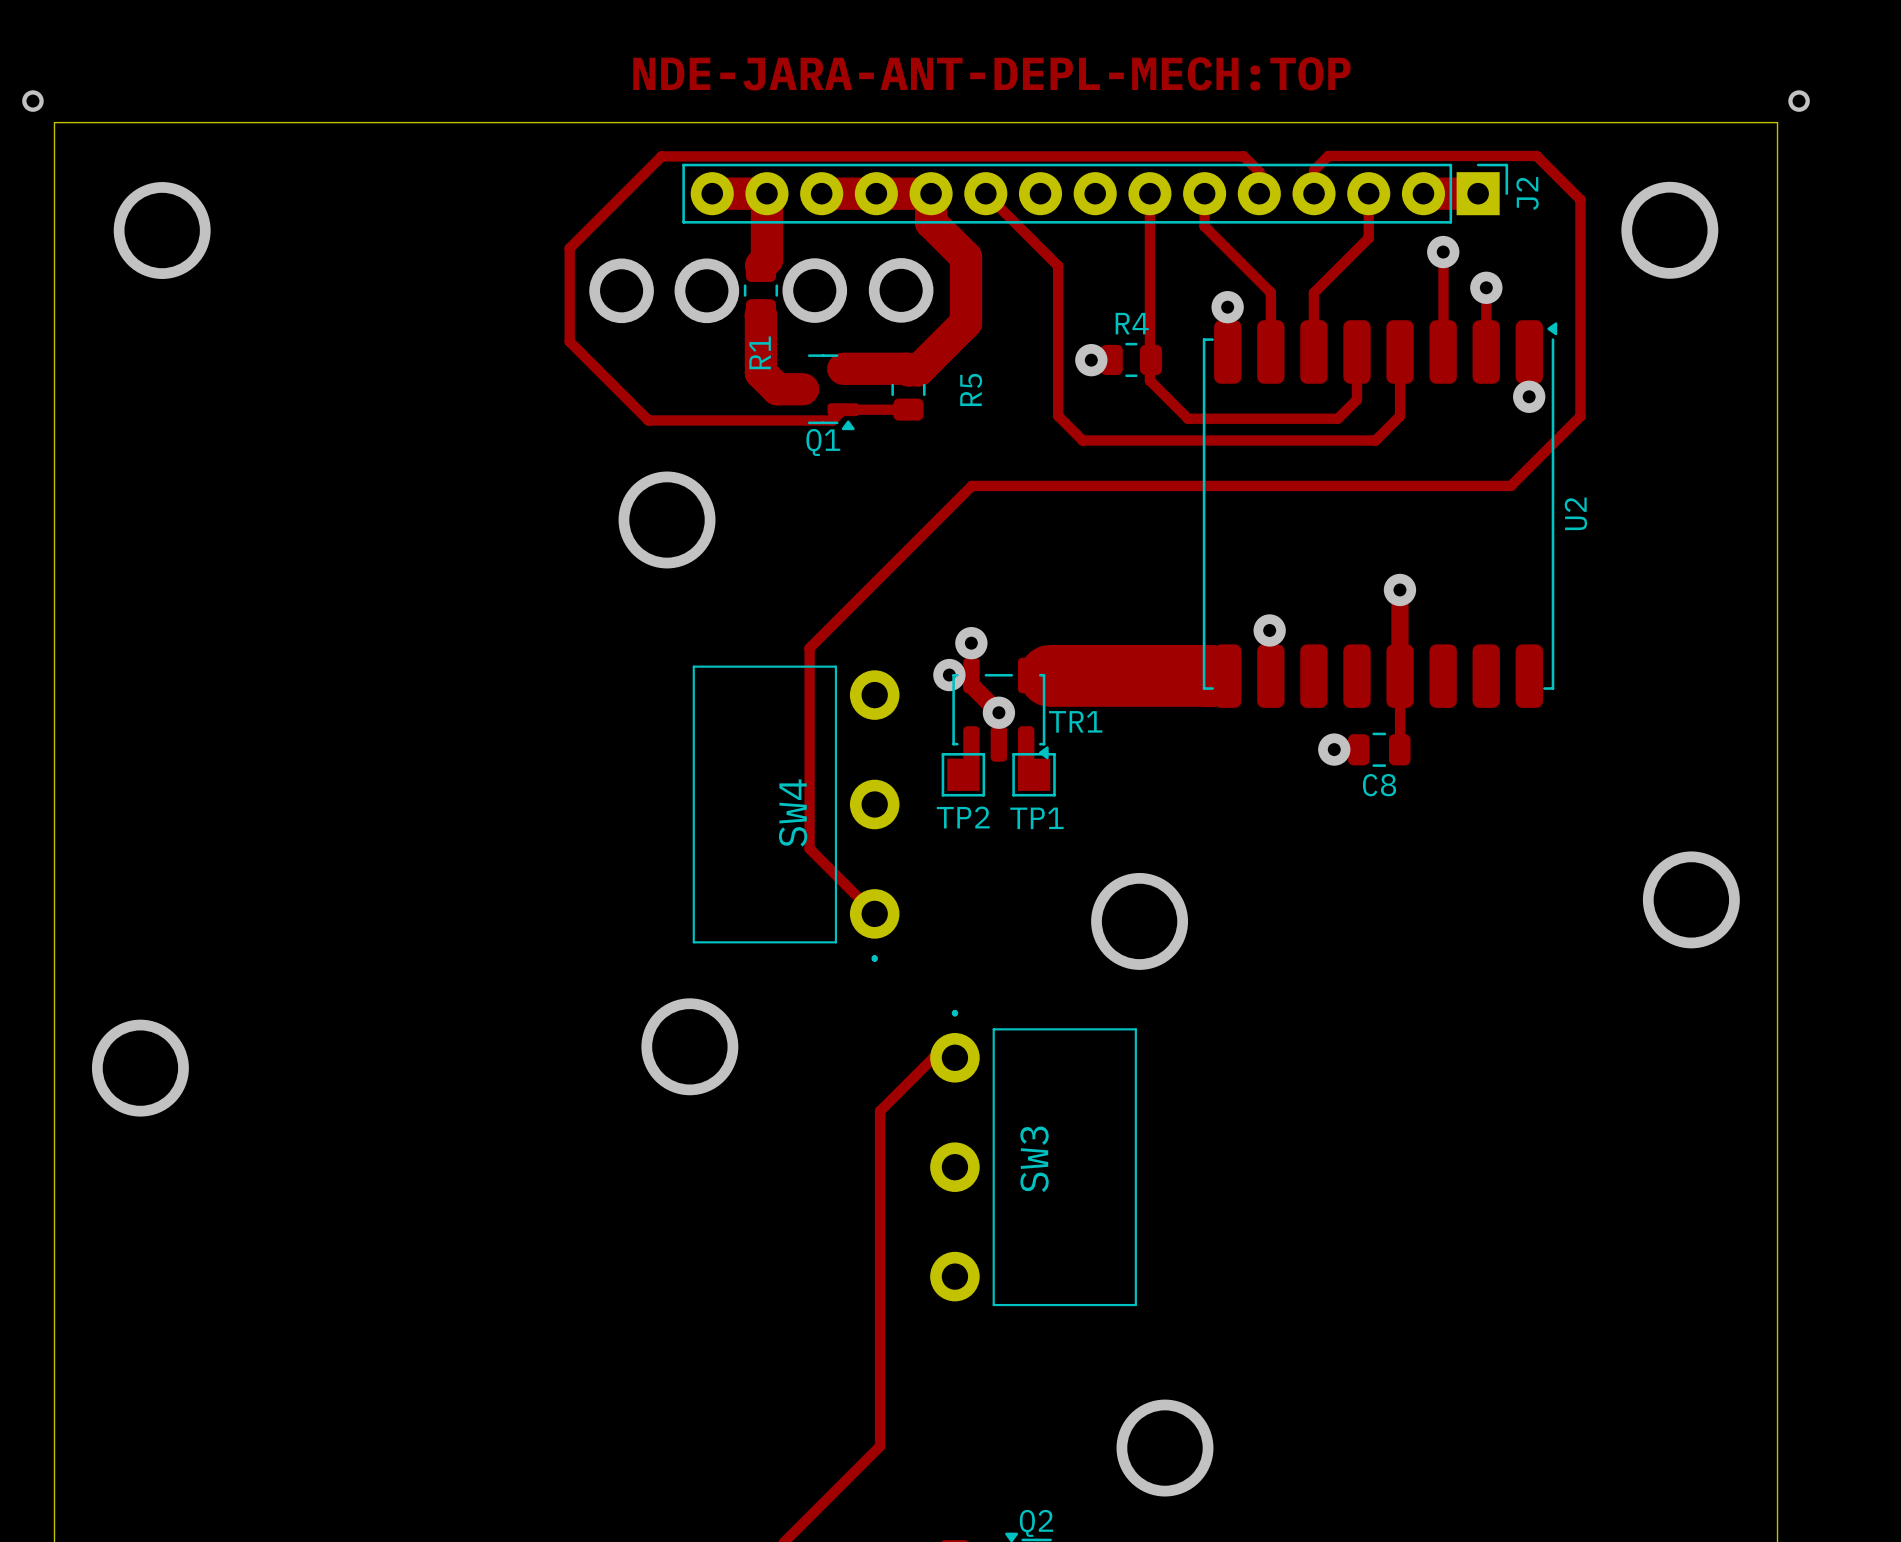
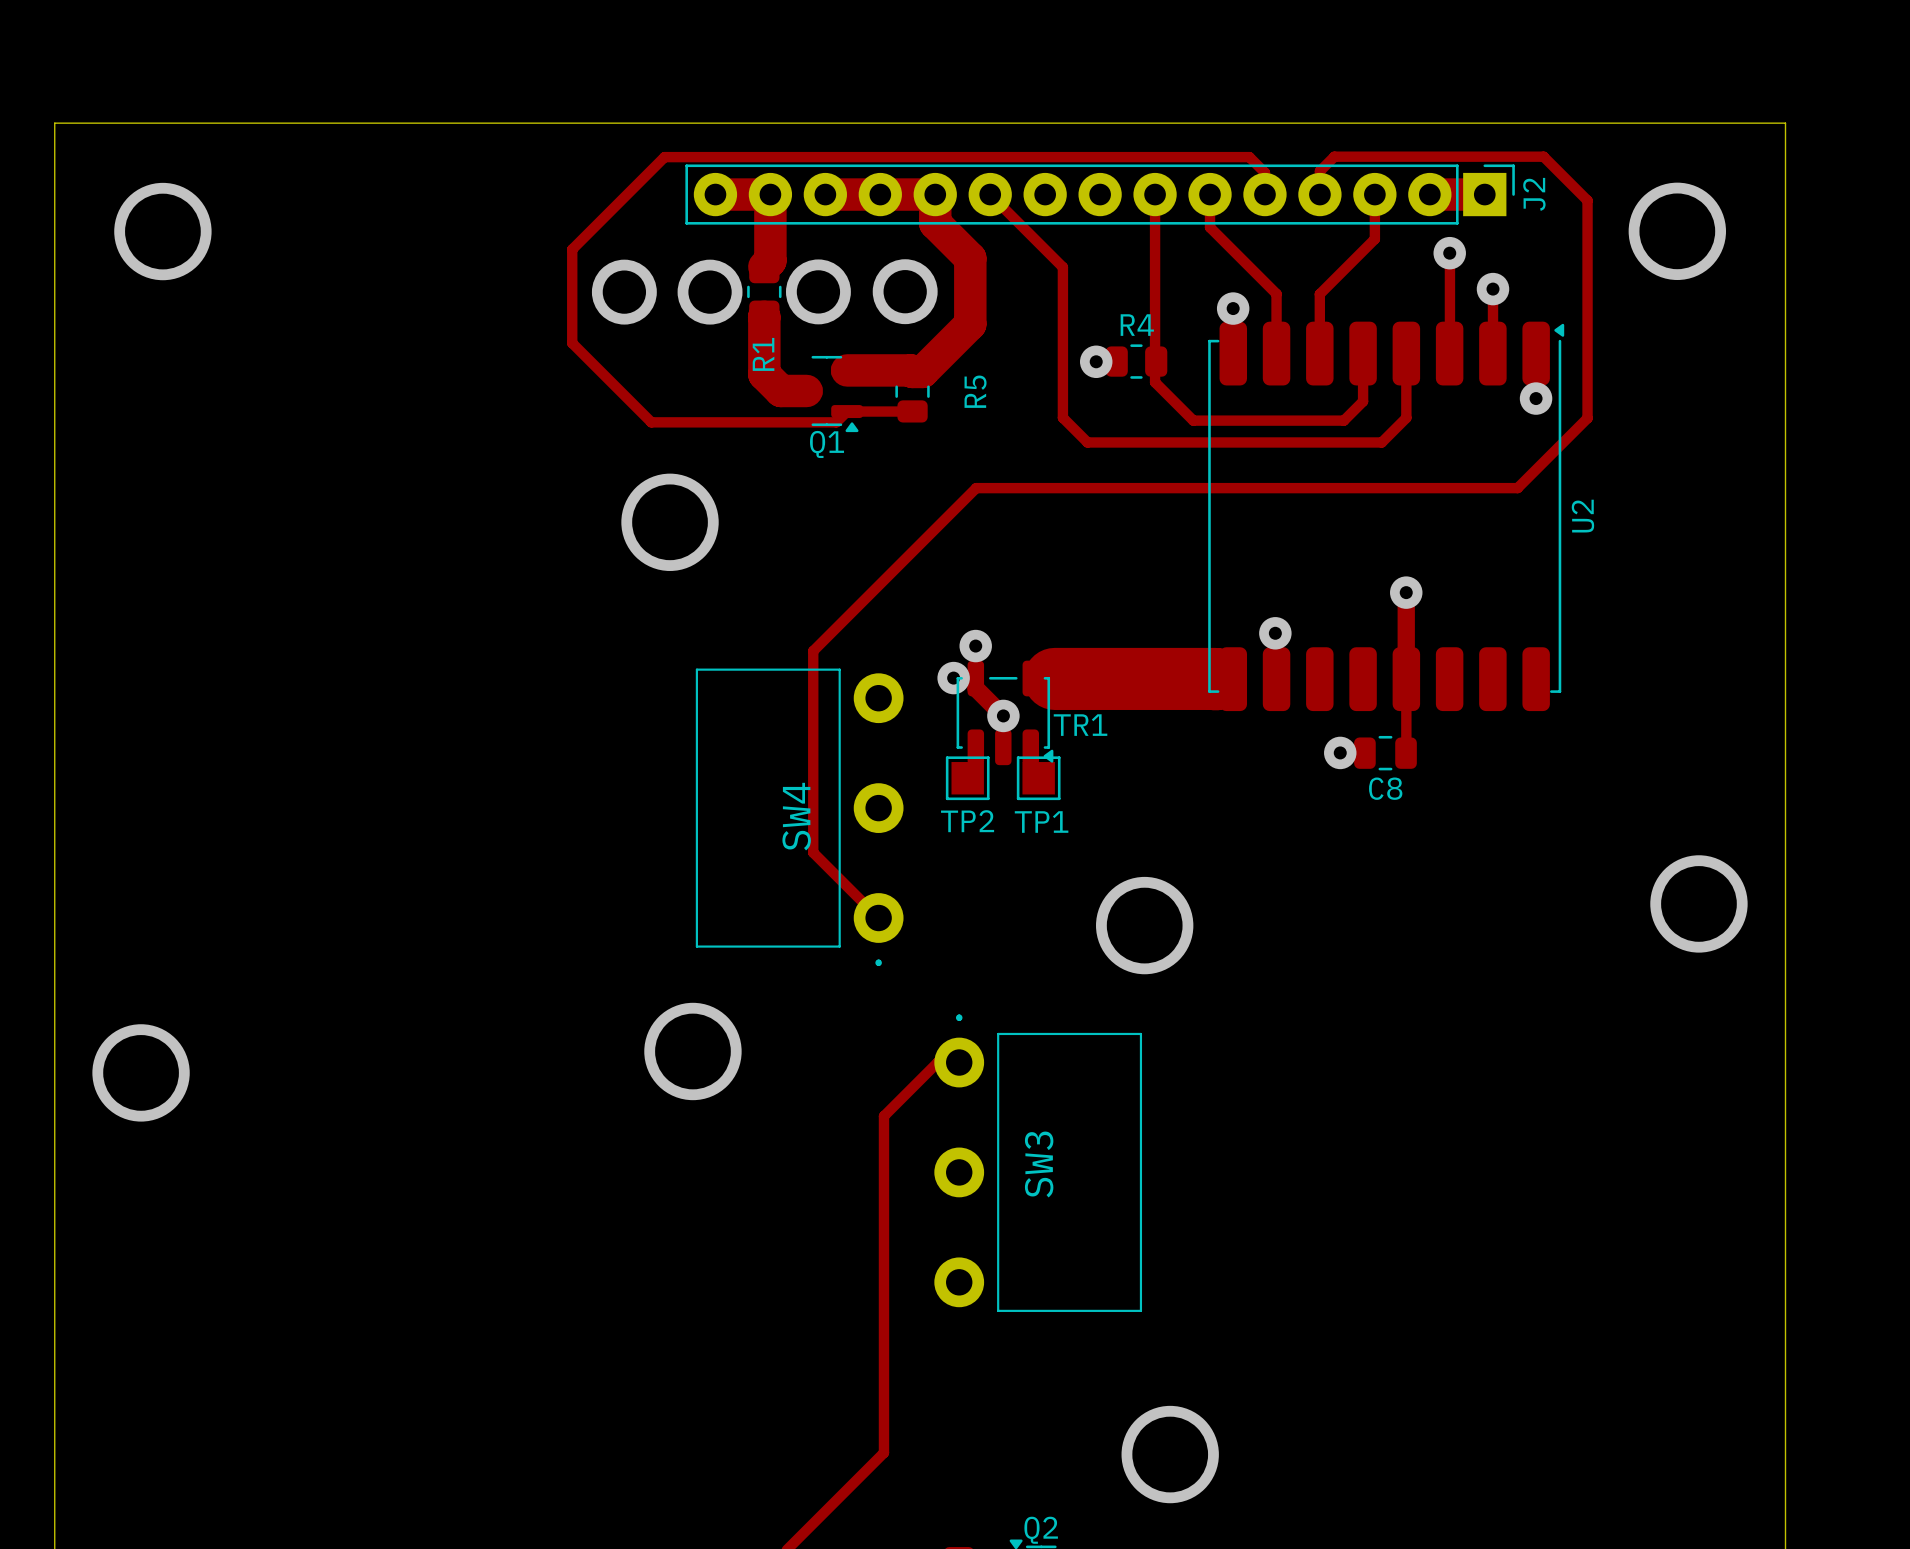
text: NDE-JARA-ANT-DEPL-MECH:TOP (991, 73) -> none
via: (32, 101) -> none
via: (1799, 101) -> none

